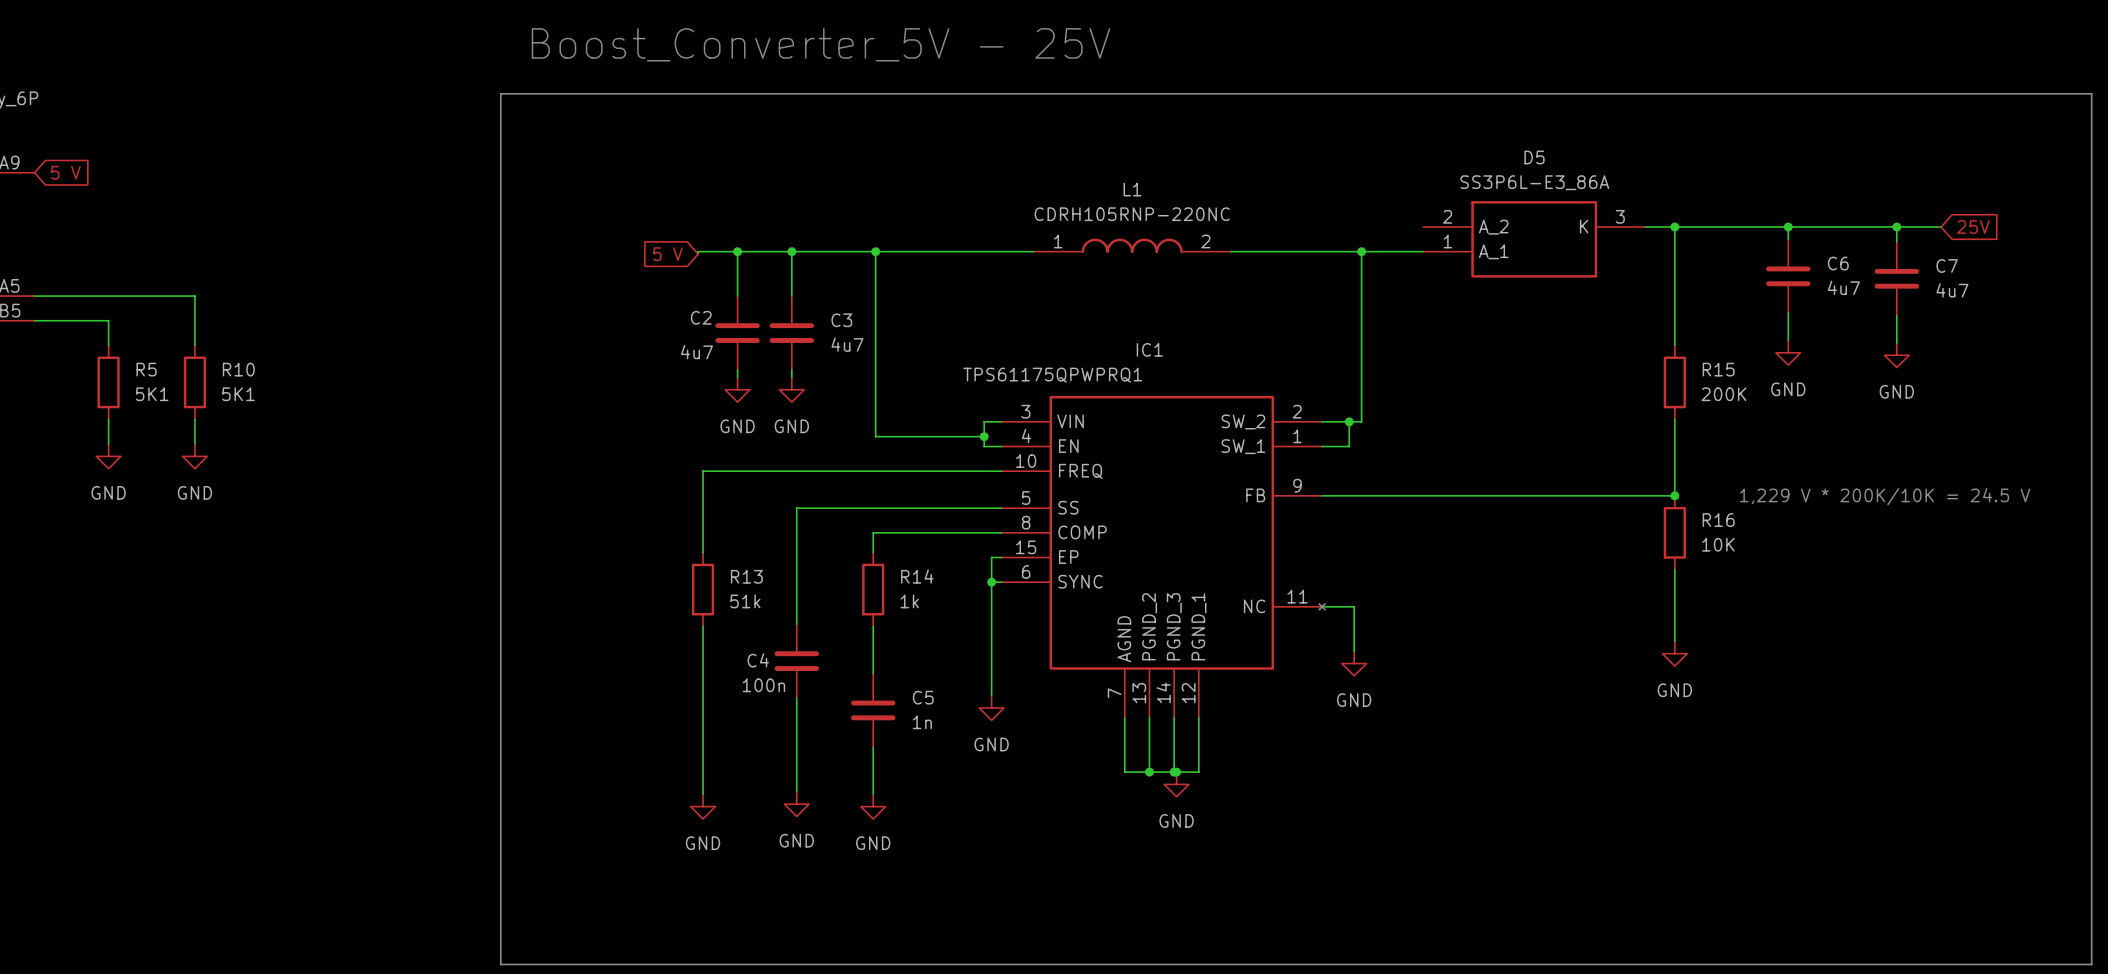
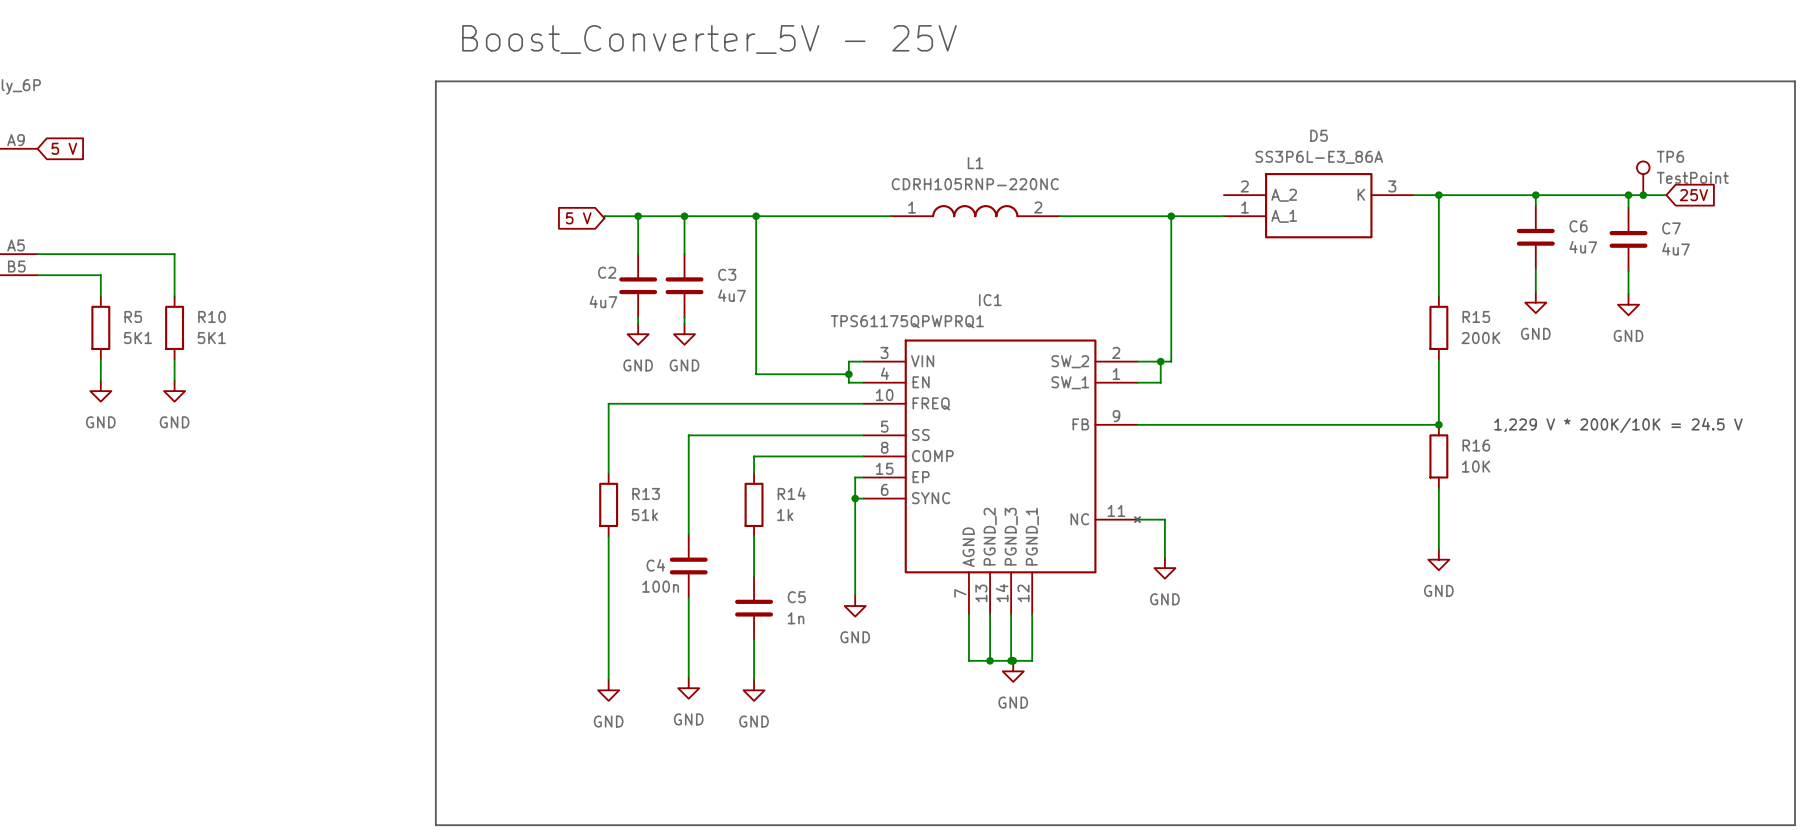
TP6: none -> TestPoint (1643, 178)
junction: none -> (1643, 195)

